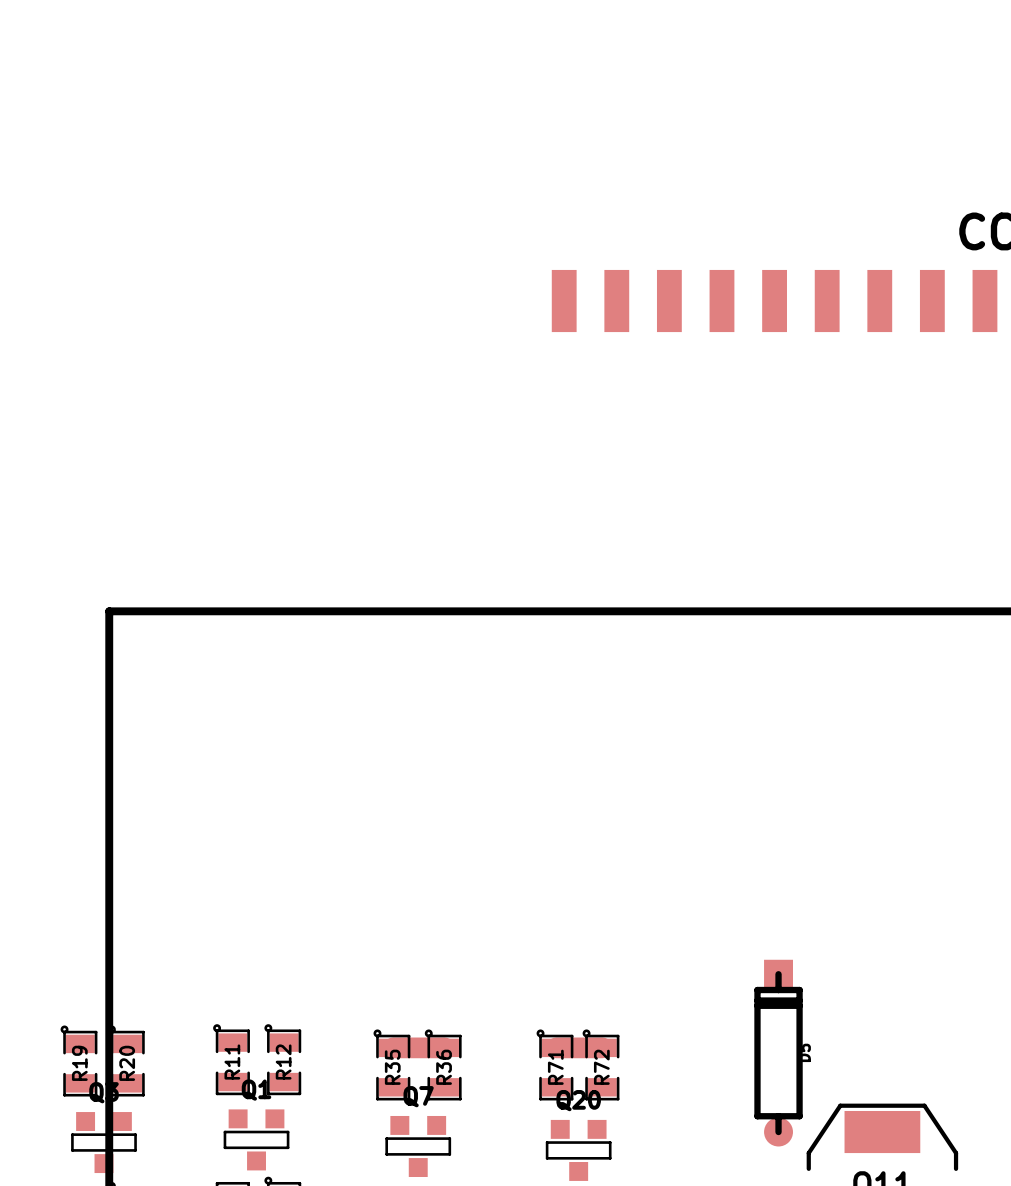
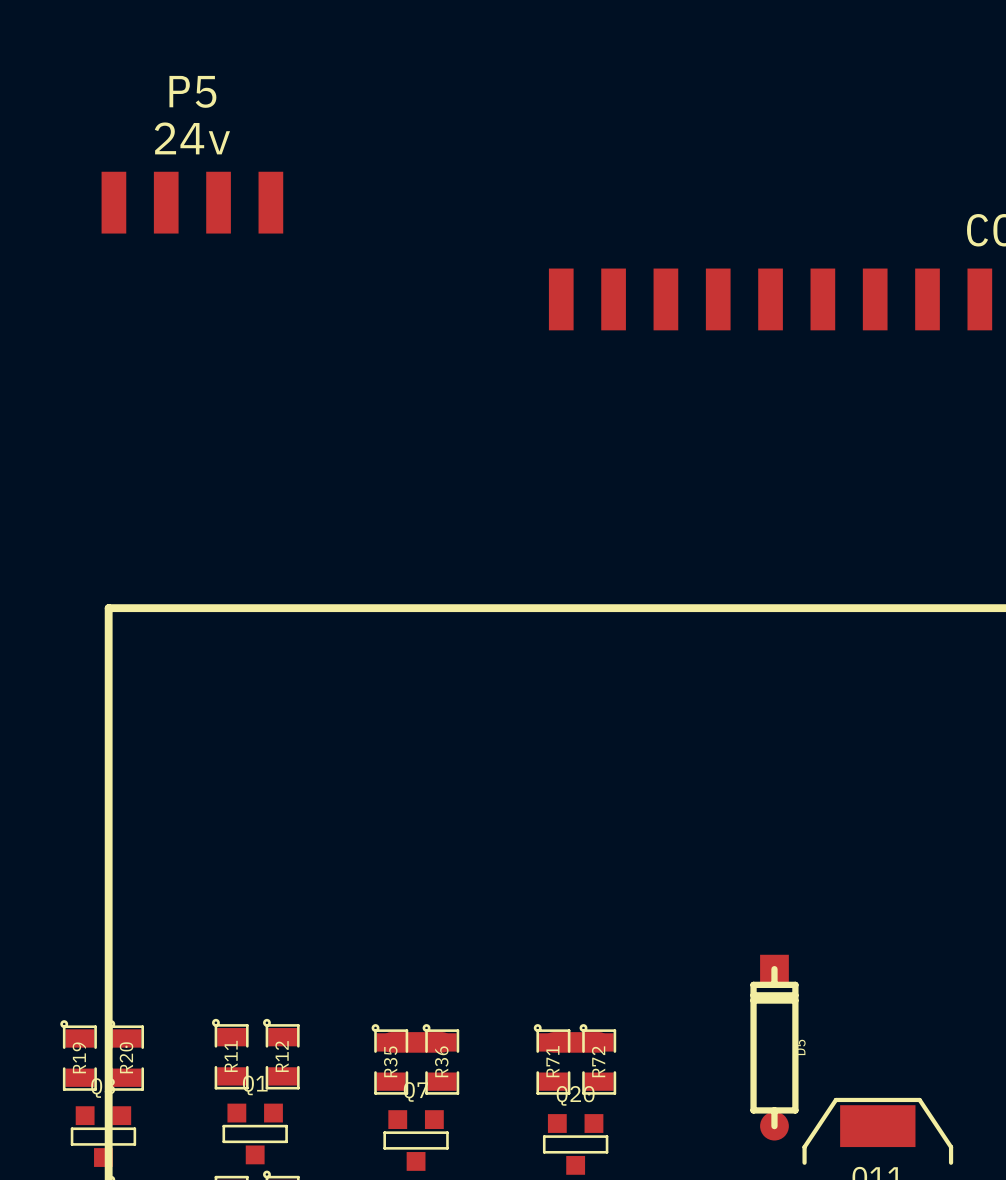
P5: none -> 24v (192, 202)

